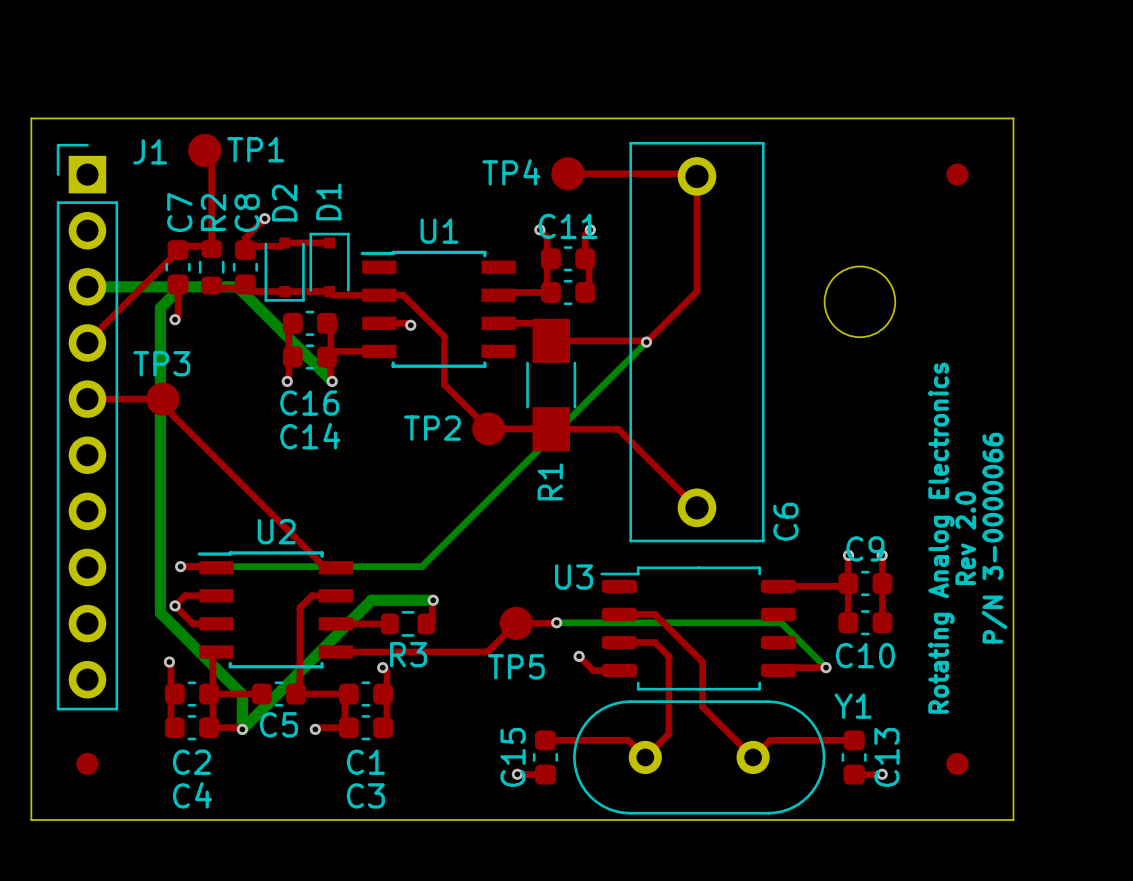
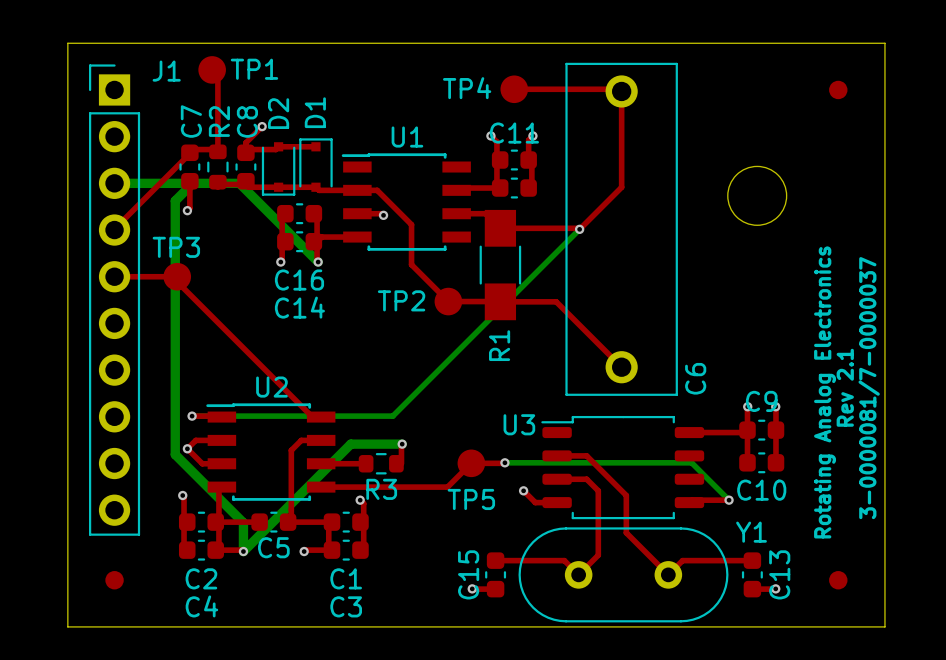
text: Rev 2.0 (965, 538) -> Rev 2.1 (845, 387)
text: P/N 3-0000066 (994, 538) -> 3-0000081/7-0000037 (869, 388)

